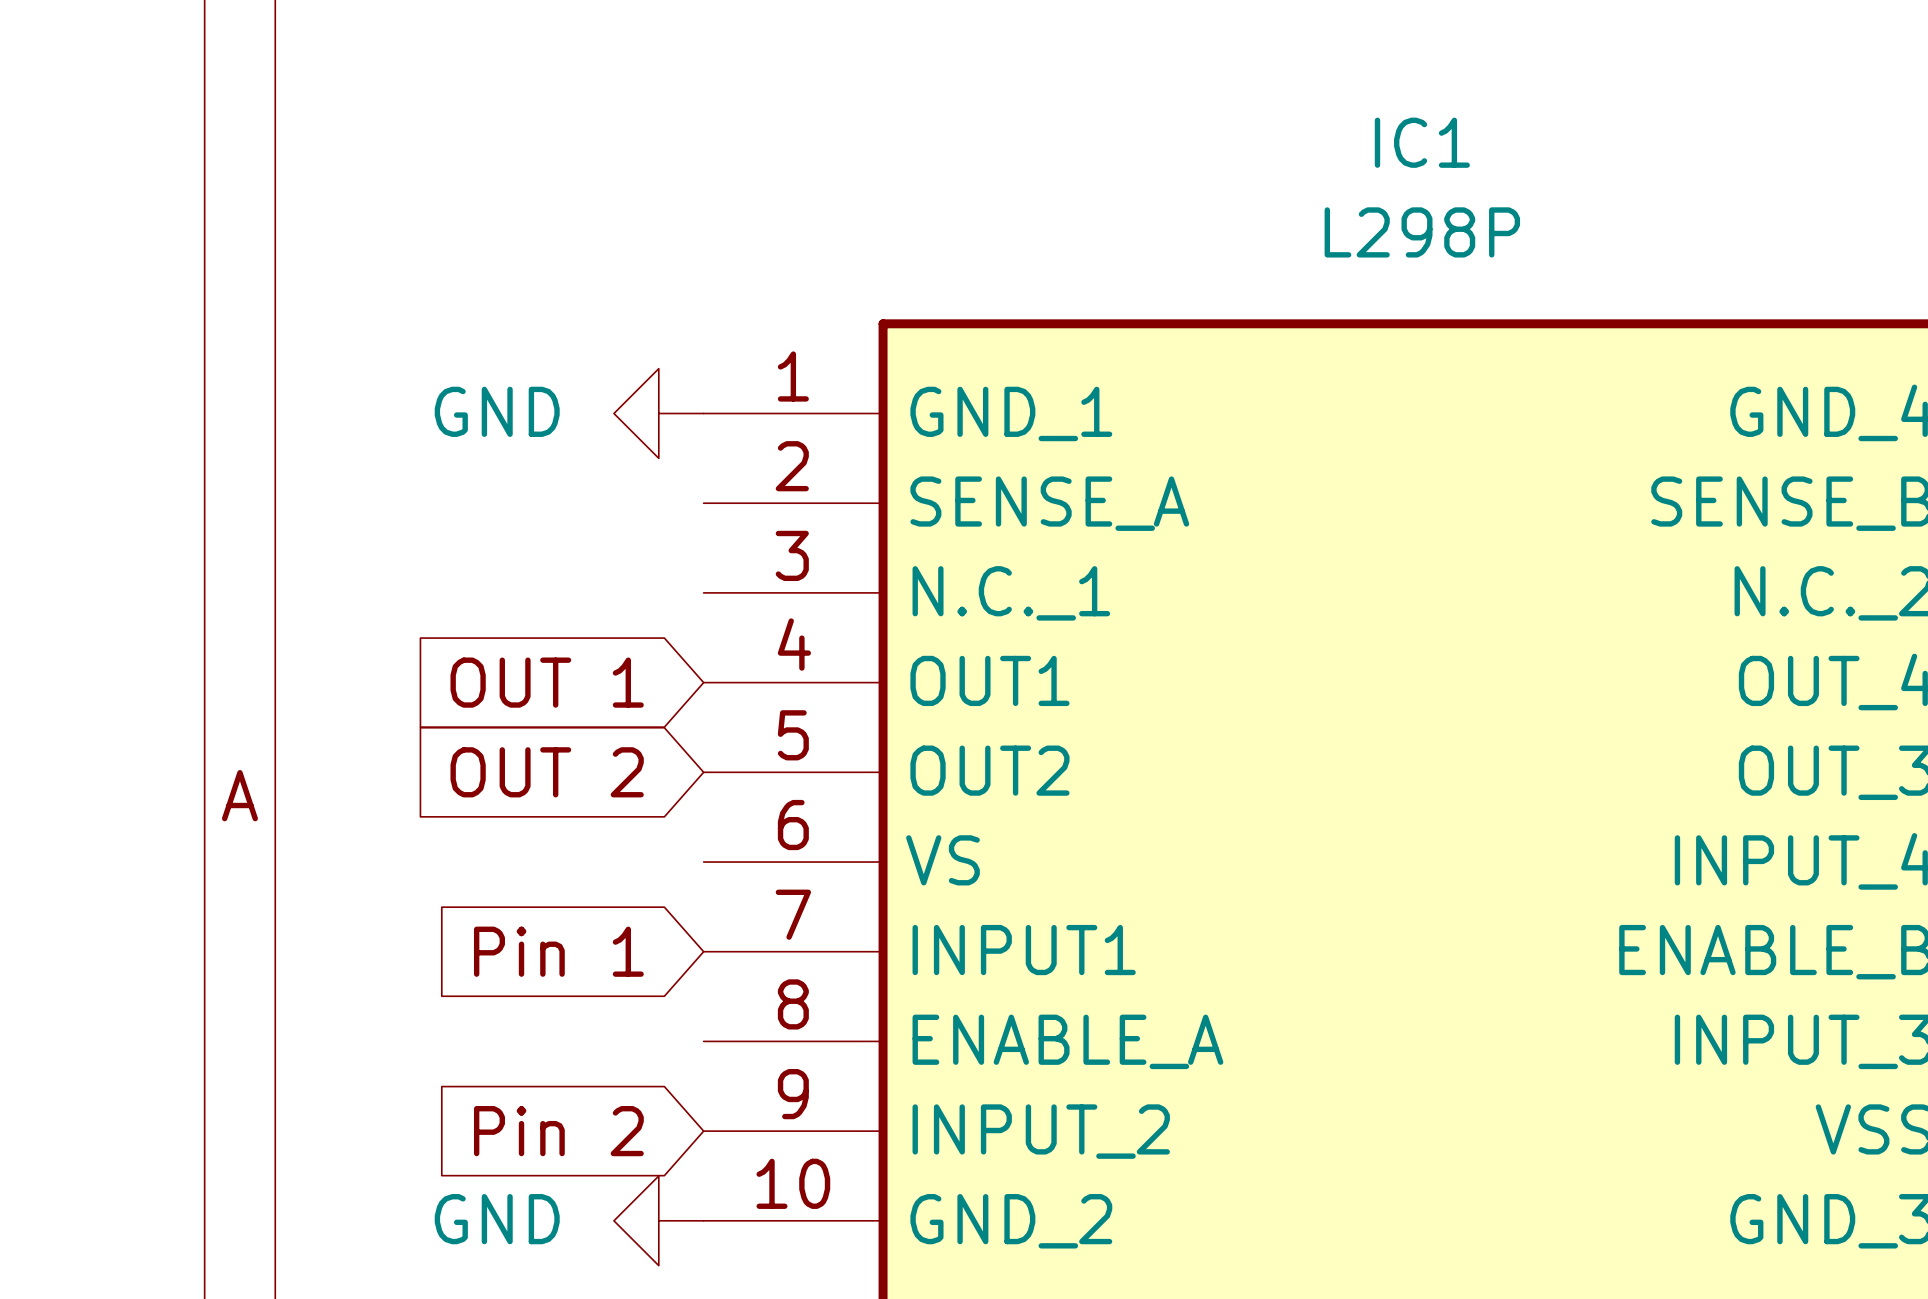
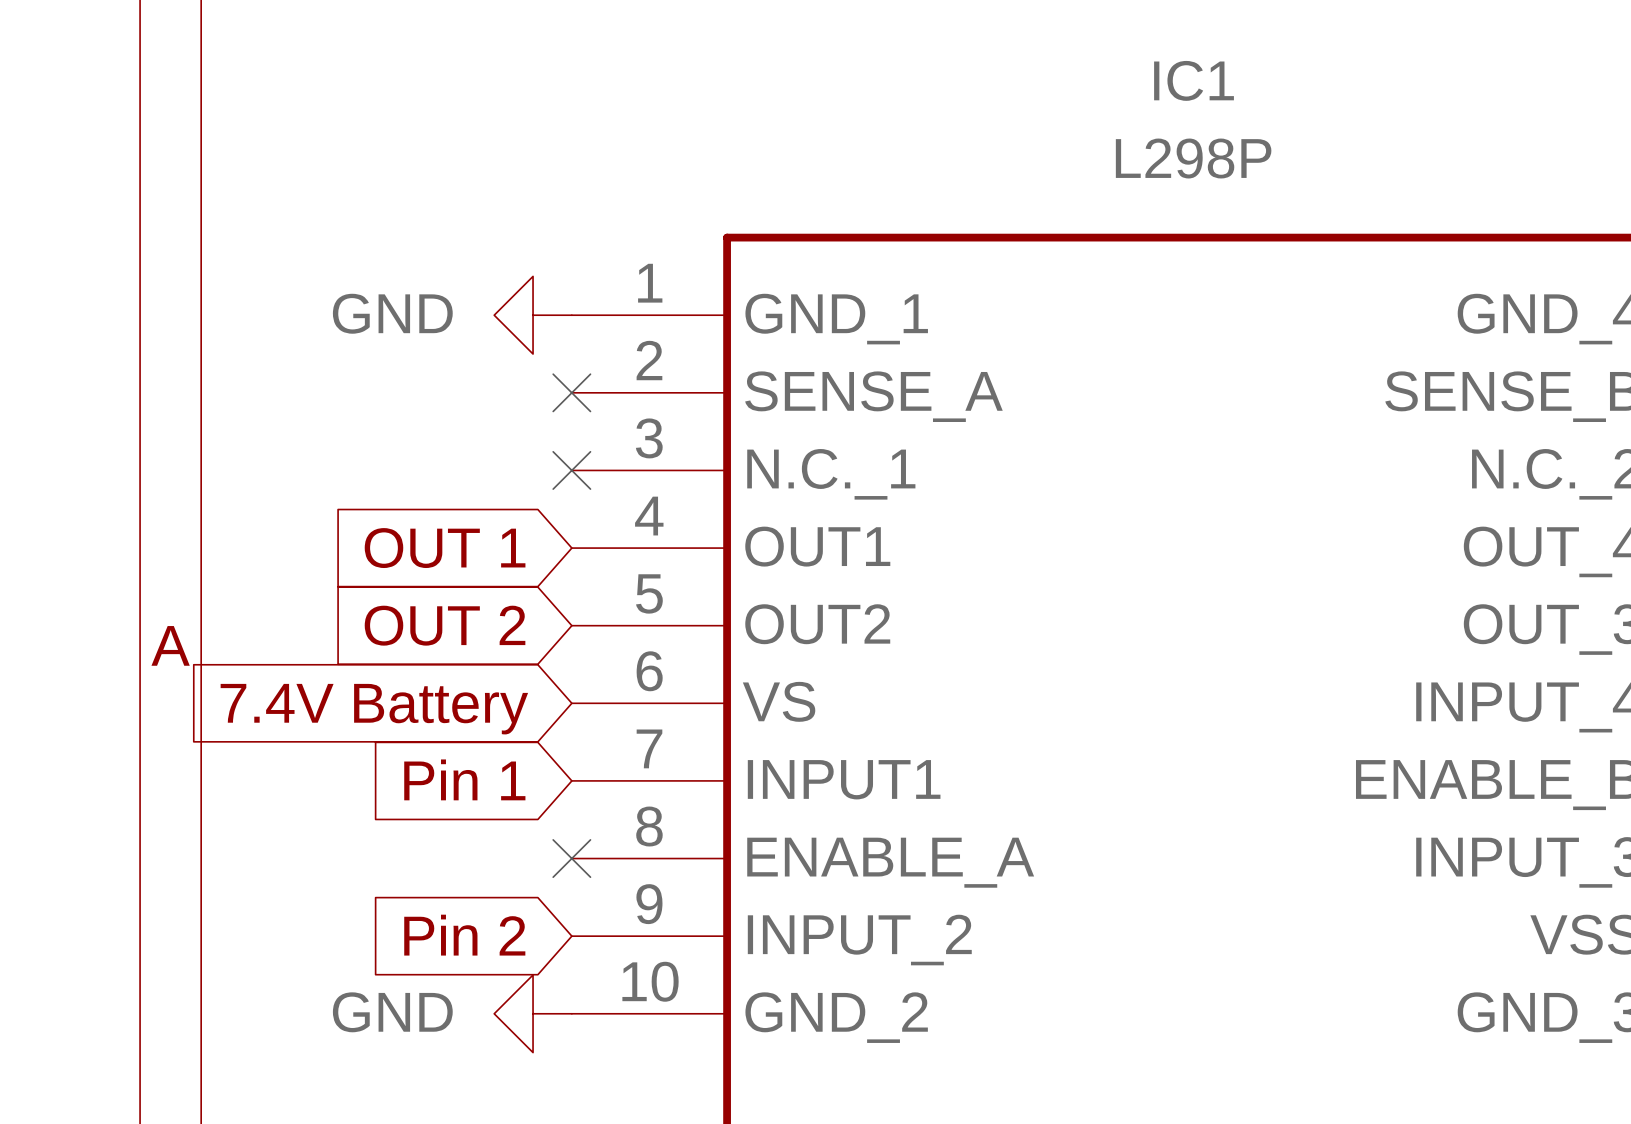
no-connect mark: none -> (571, 392)
no-connect mark: none -> (571, 470)
global label: none -> 7.4V Battery (374, 709)
no-connect mark: none -> (571, 858)

